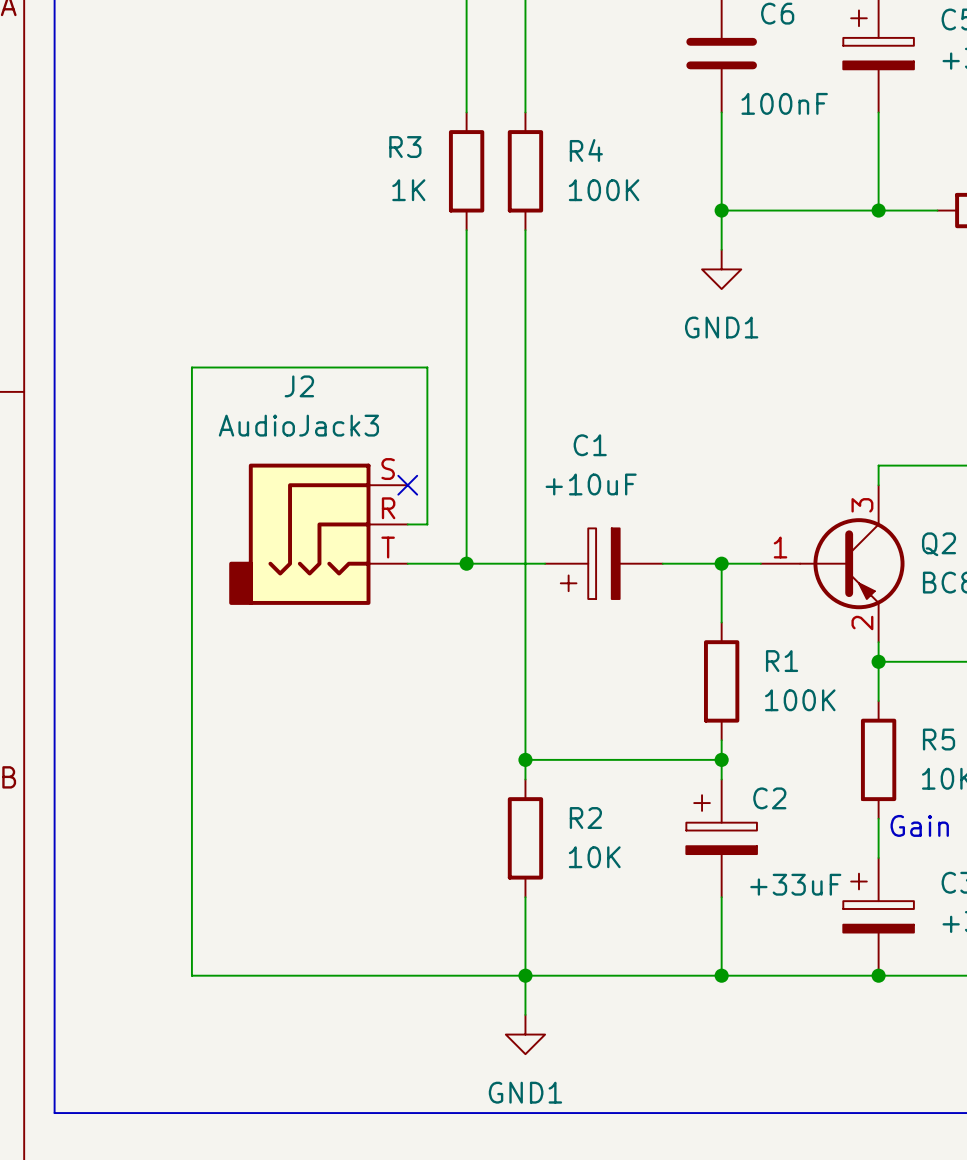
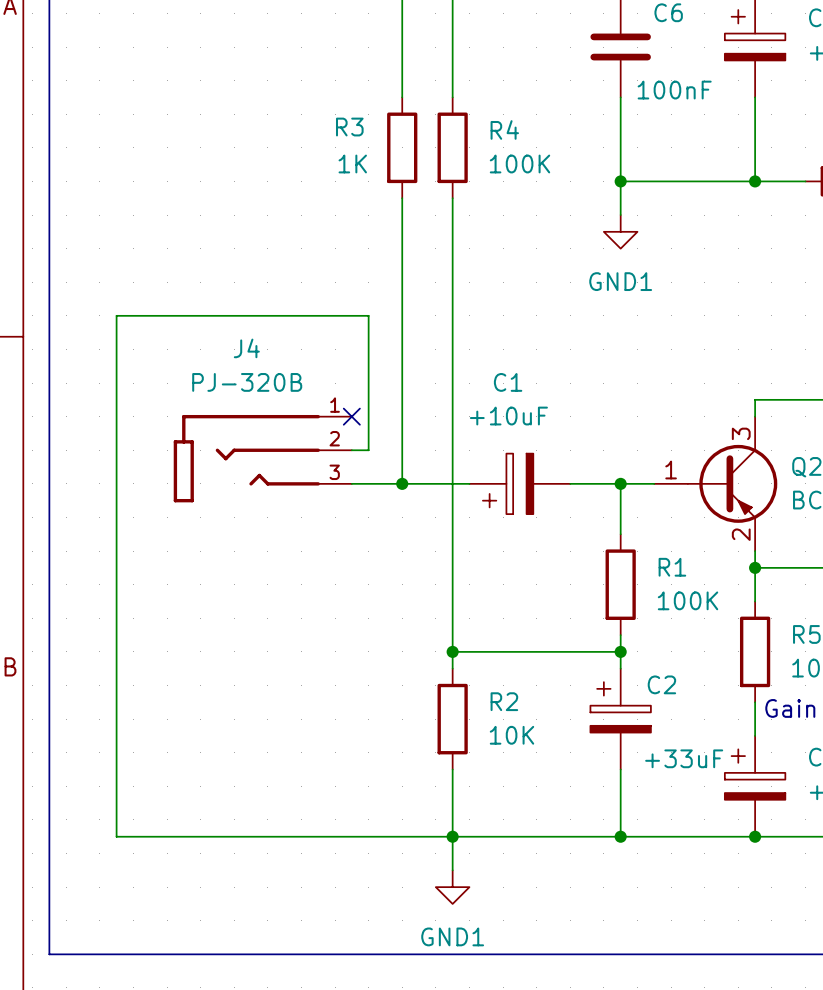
wire: (191, 367) (191, 975) -> (167, 315) (116, 315) (116, 836) (167, 836)
J4: none -> PJ-320B (262, 458)
J2: AudioJack3 (318, 534) -> none

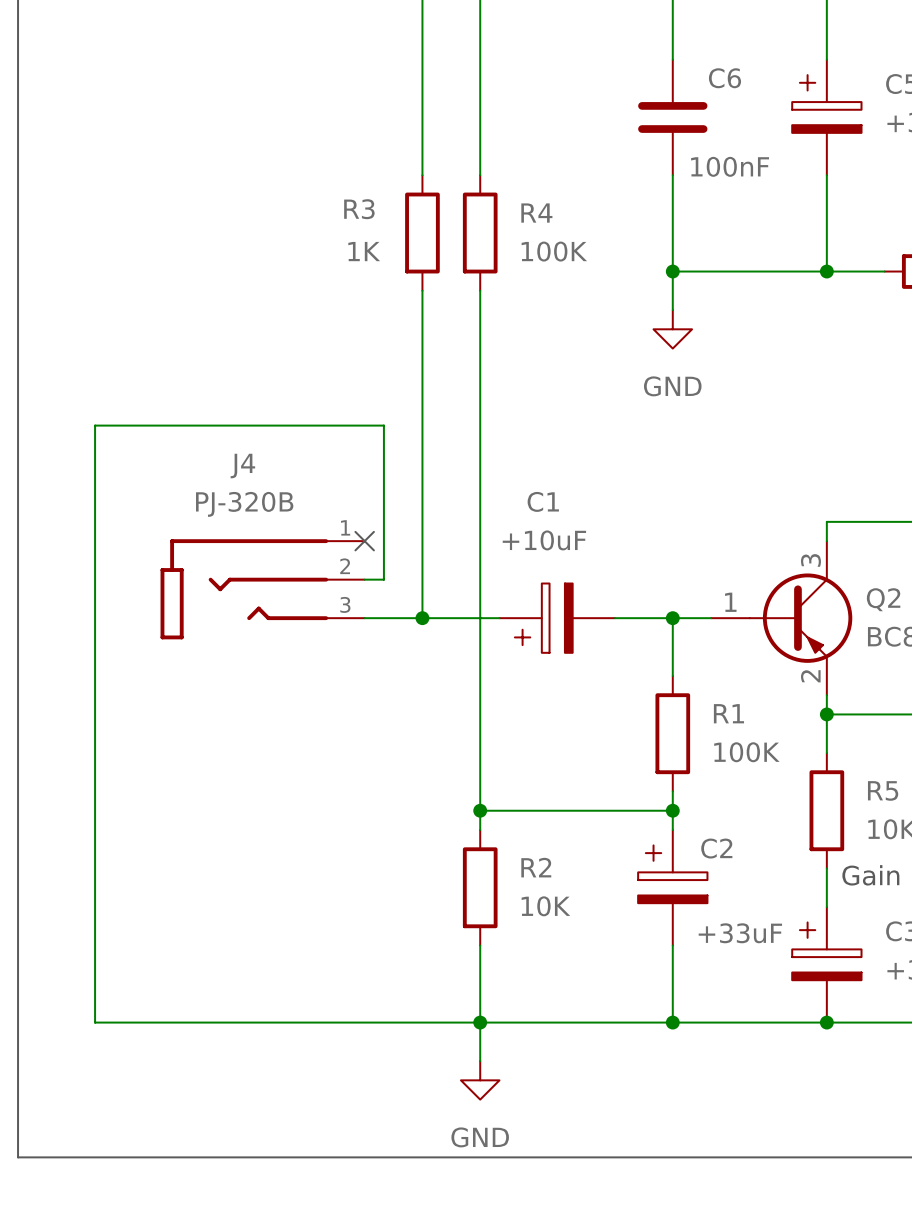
power symbol: GND1 (620, 231) -> GND (672, 329)
power symbol: GND1 (452, 887) -> GND (480, 1080)

